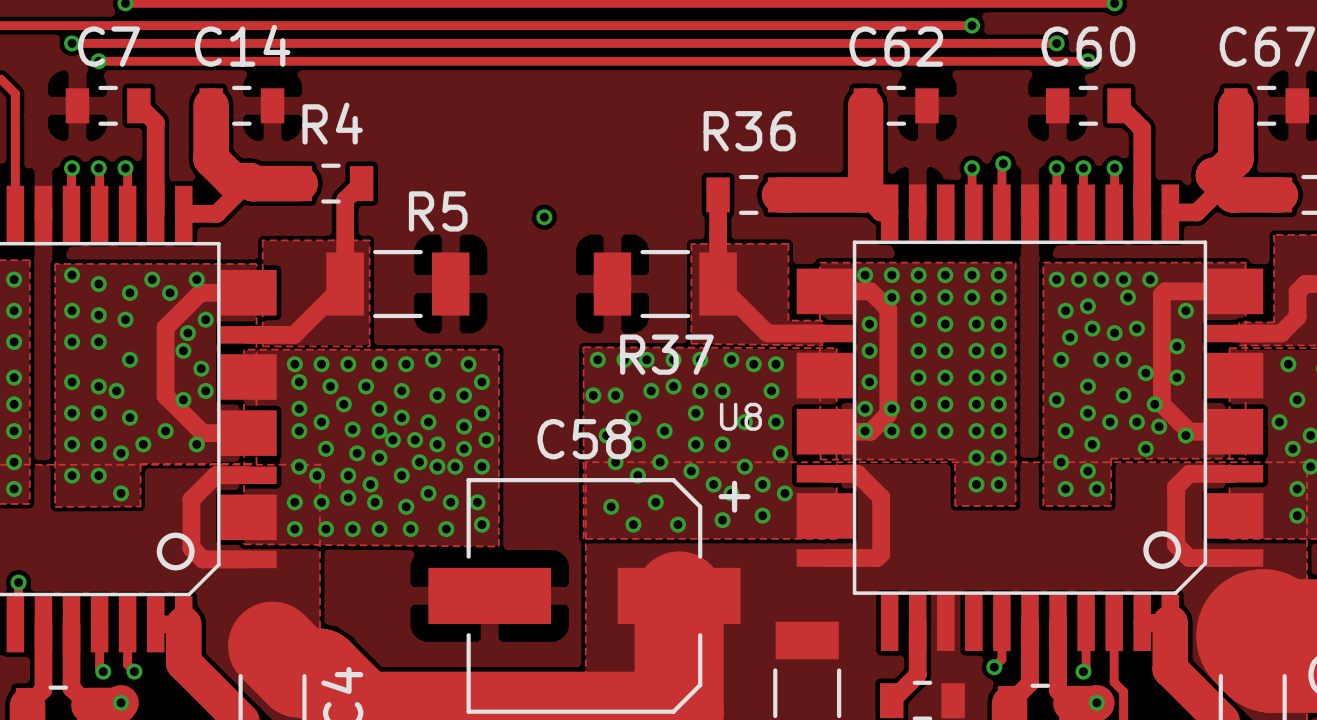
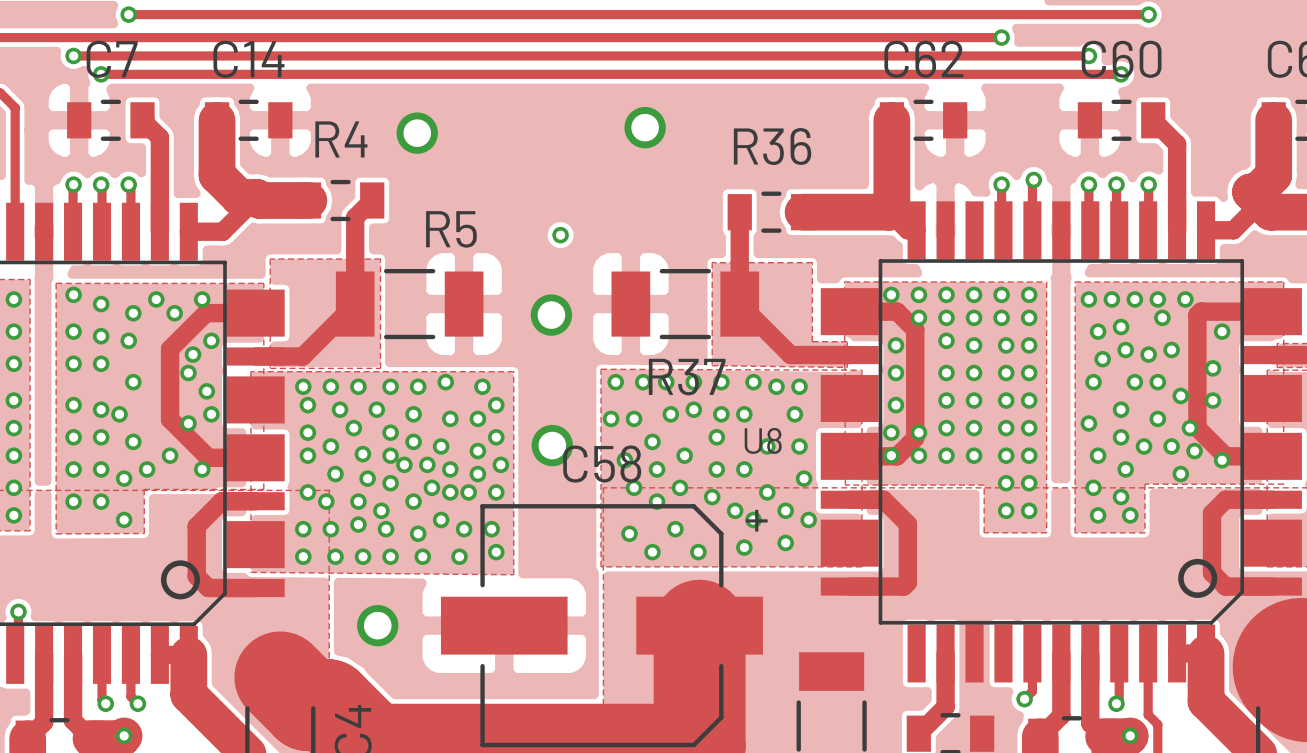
via: none -> (645, 127)
via: none -> (417, 133)
via: none -> (551, 315)
via: none -> (552, 445)
via: none -> (377, 625)

